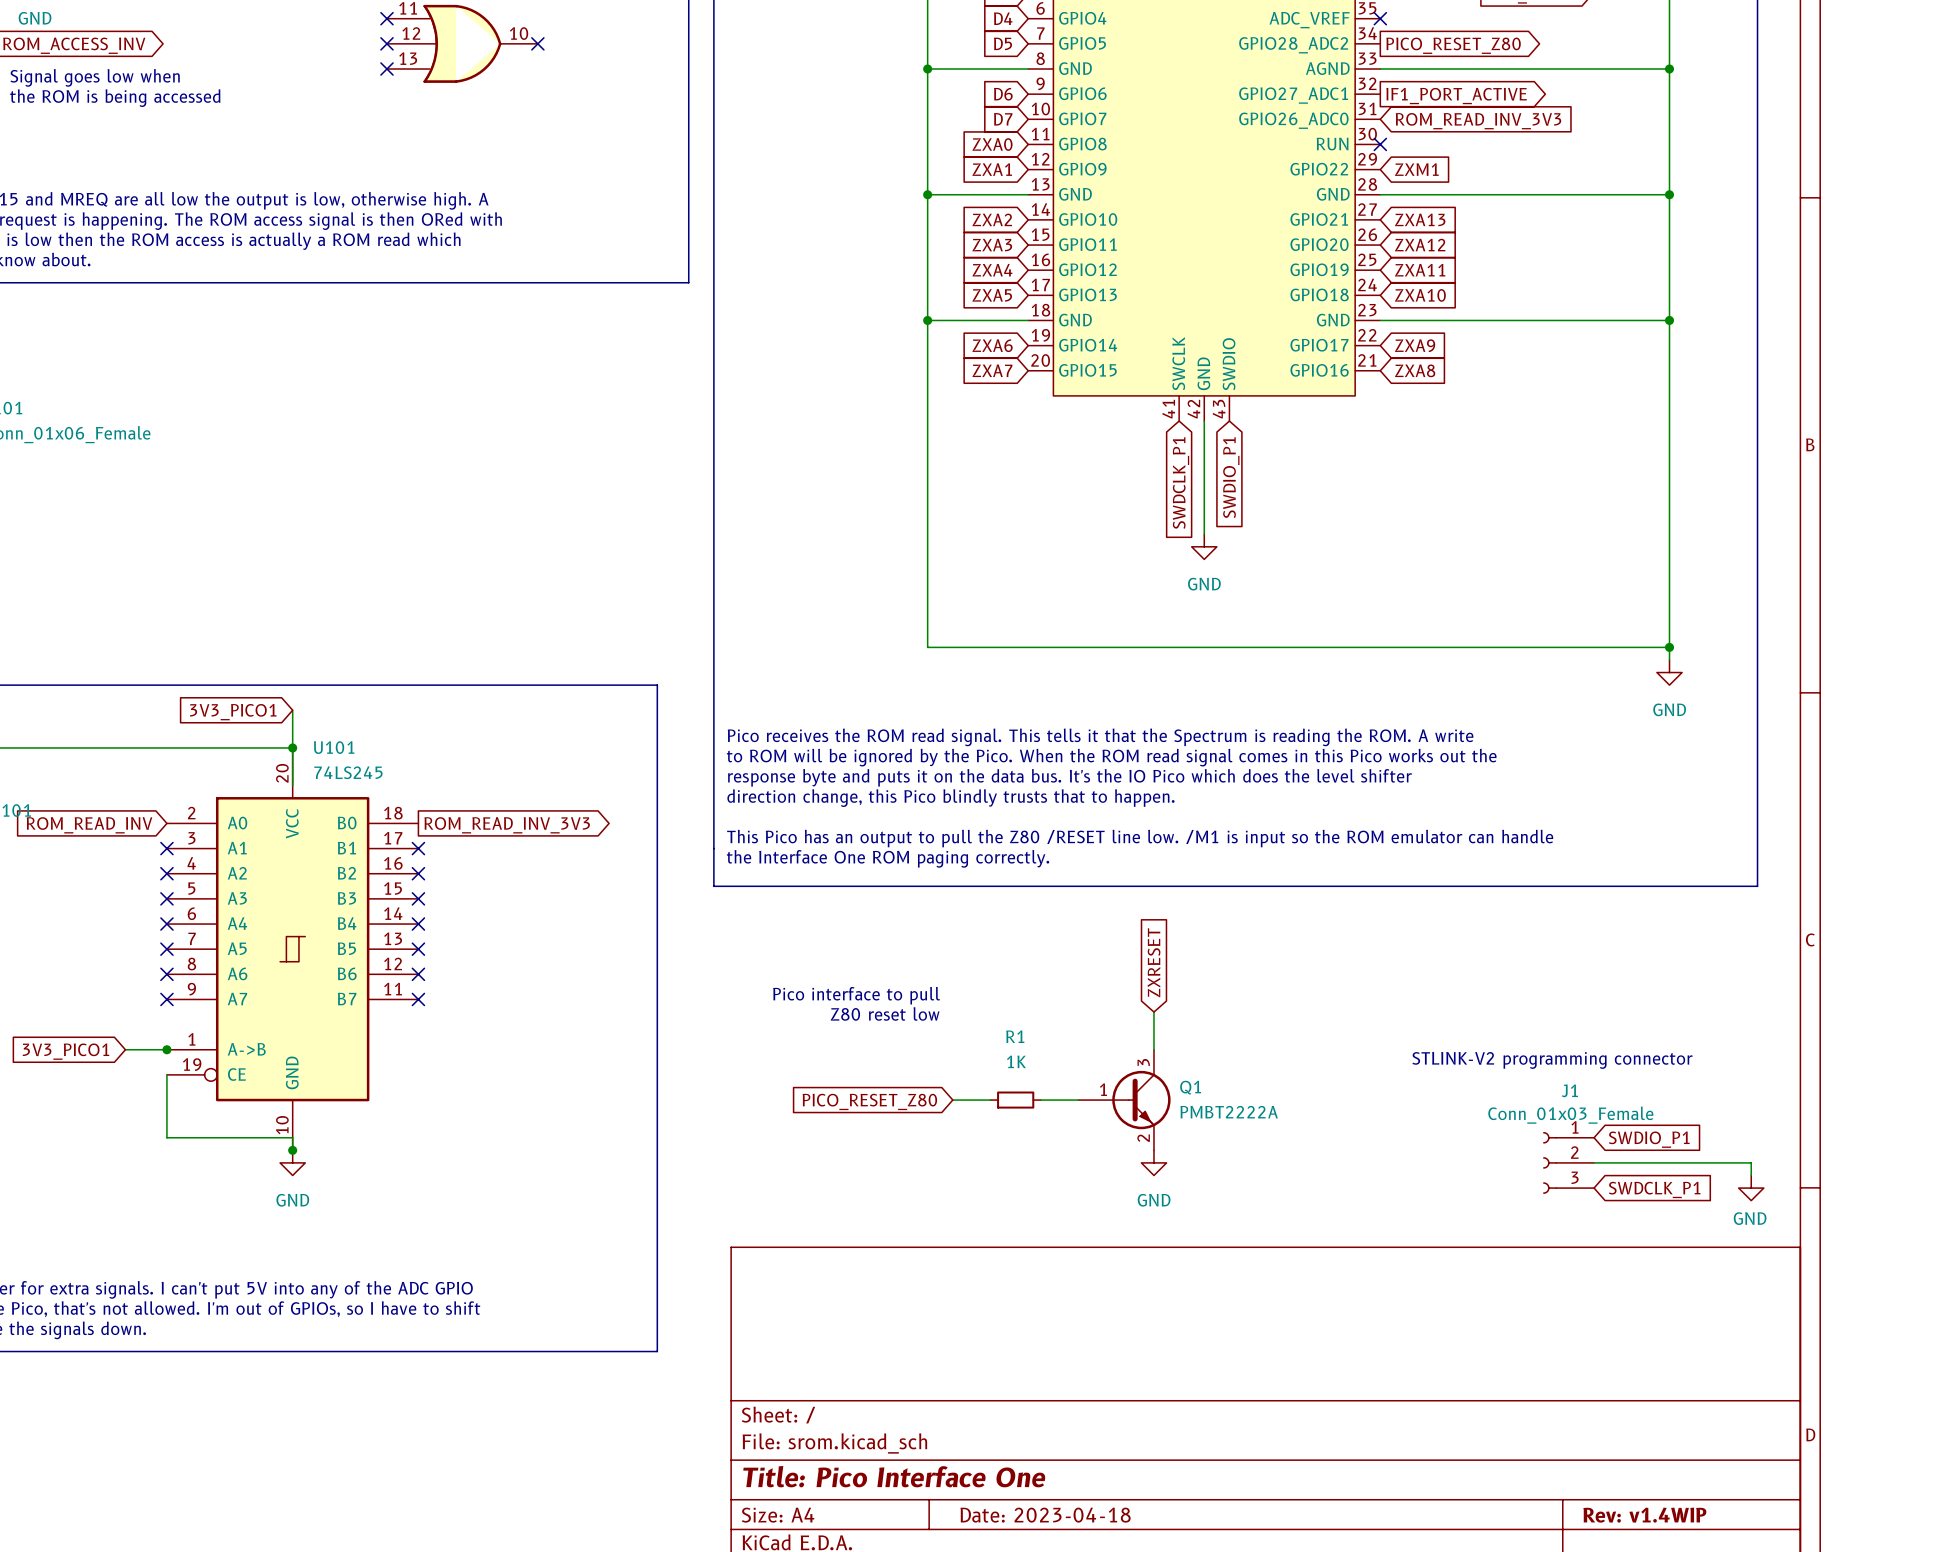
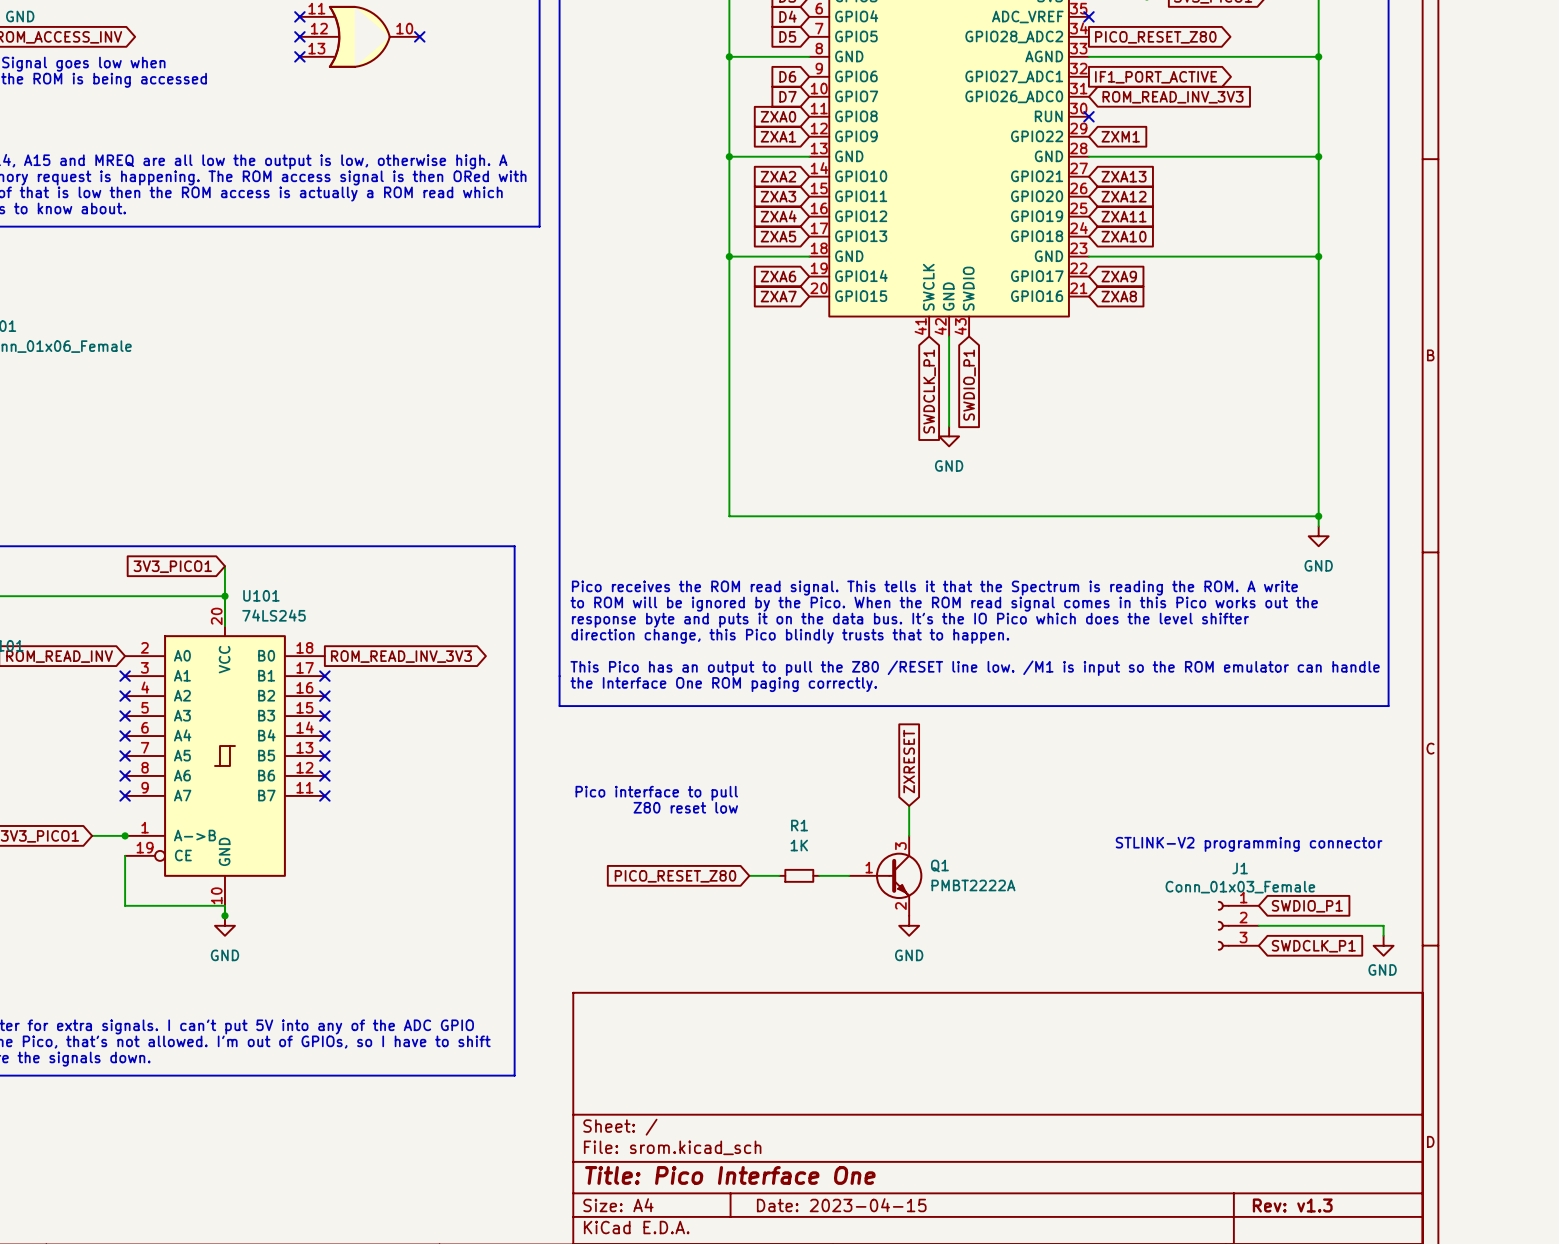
title block: Date: 2023-04-18 (1045, 1515) -> Date: 2023-04-15 (841, 1205)
title block: Rev: v1.4WIP (1644, 1515) -> Rev: v1.3 (1292, 1205)

